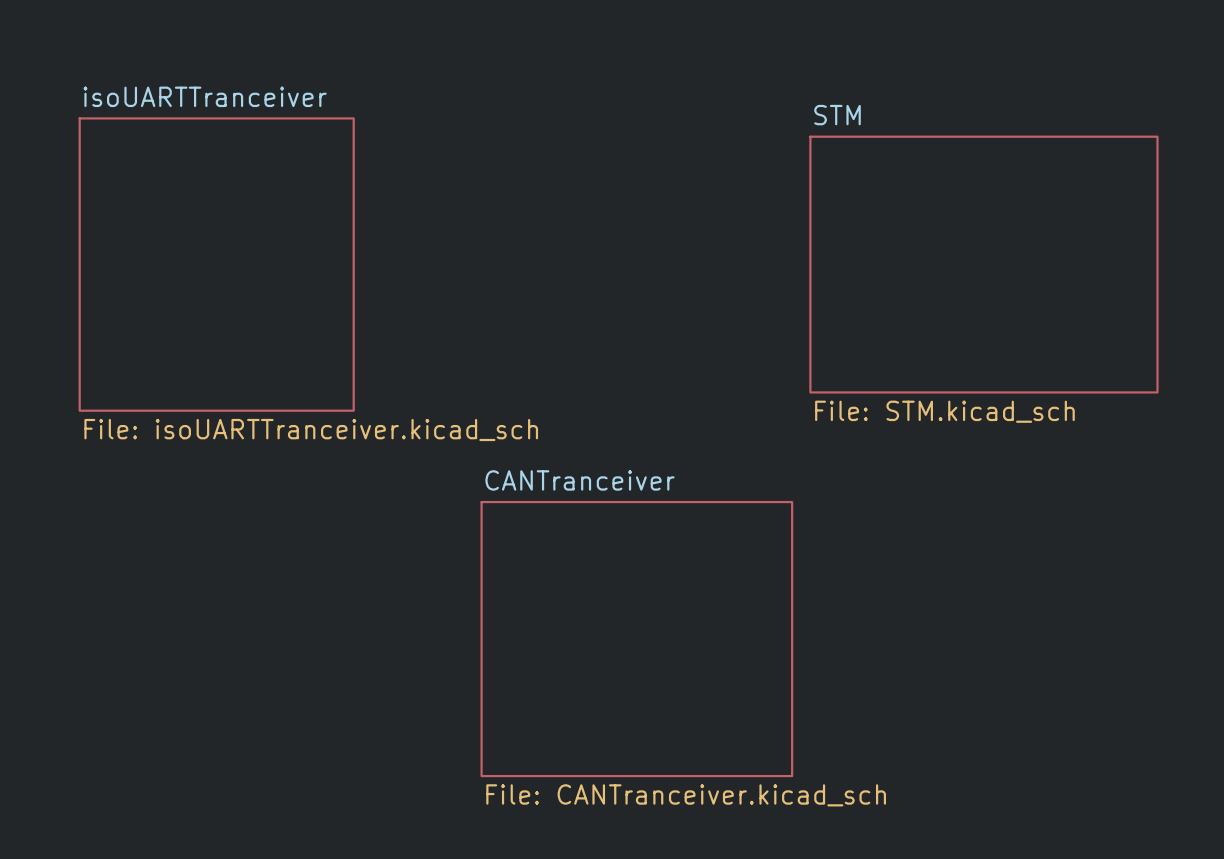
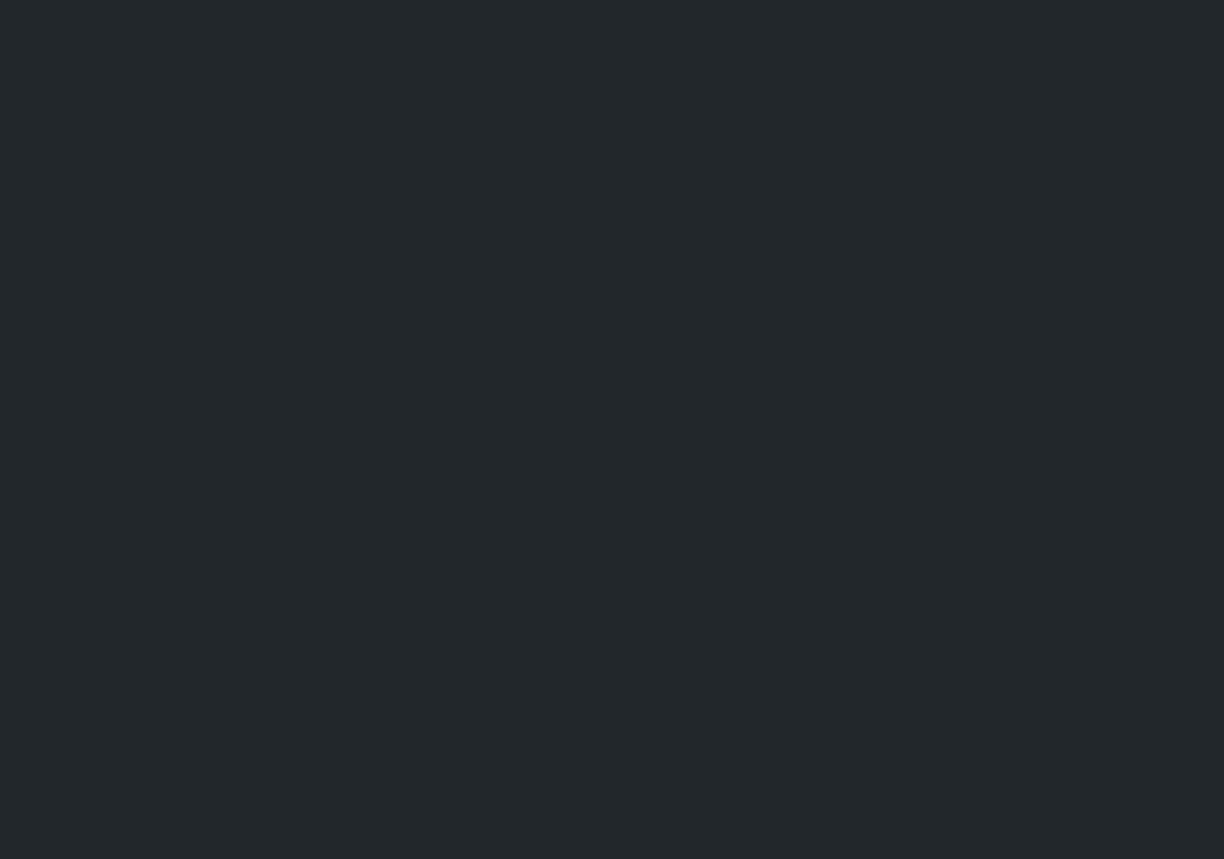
sheet isoUARTTranceiver: File: isoUARTTranceiver.kicad_sch (216, 264) -> none
sheet STM: File: STM.kicad_sch (983, 264) -> none
sheet CANTranceiver: File: CANTranceiver.kicad_sch (636, 639) -> none

